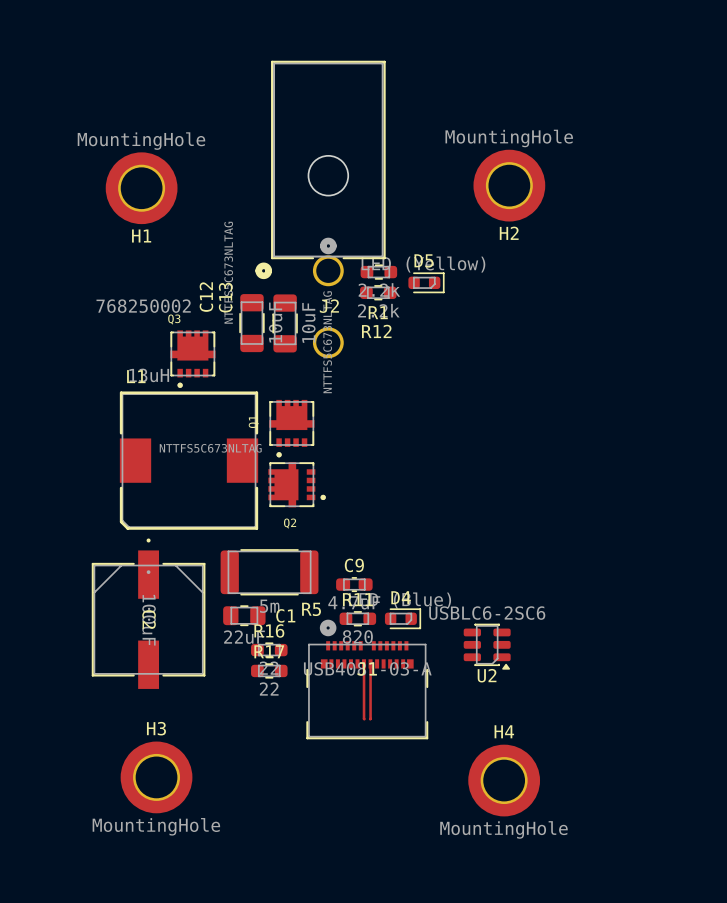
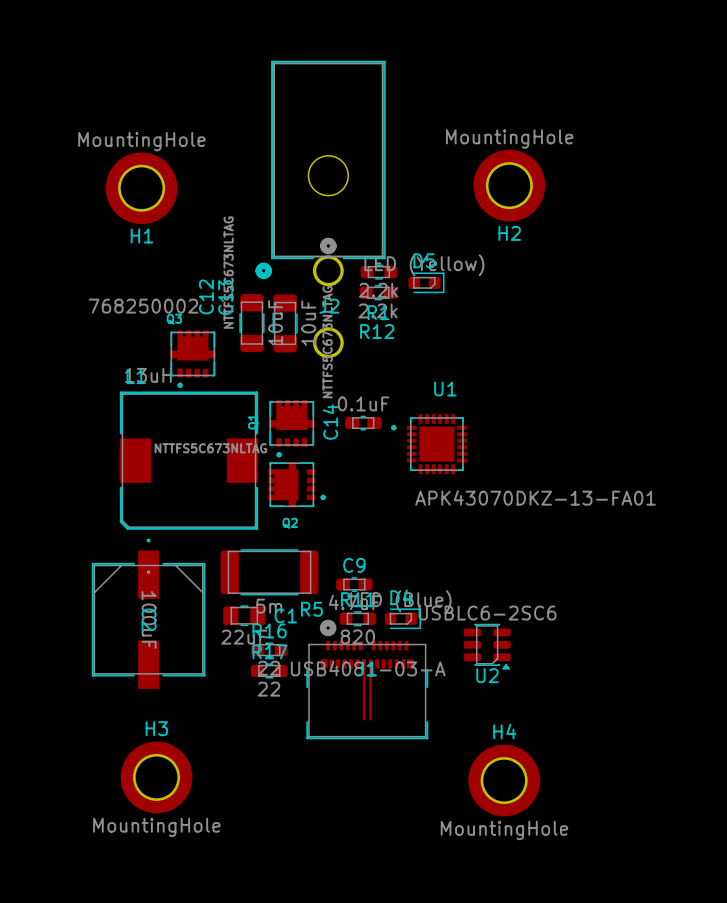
C14: none -> 0.1uF (363, 423)
U1: none -> APK43070DKZ-13-FA01 (429, 444)

